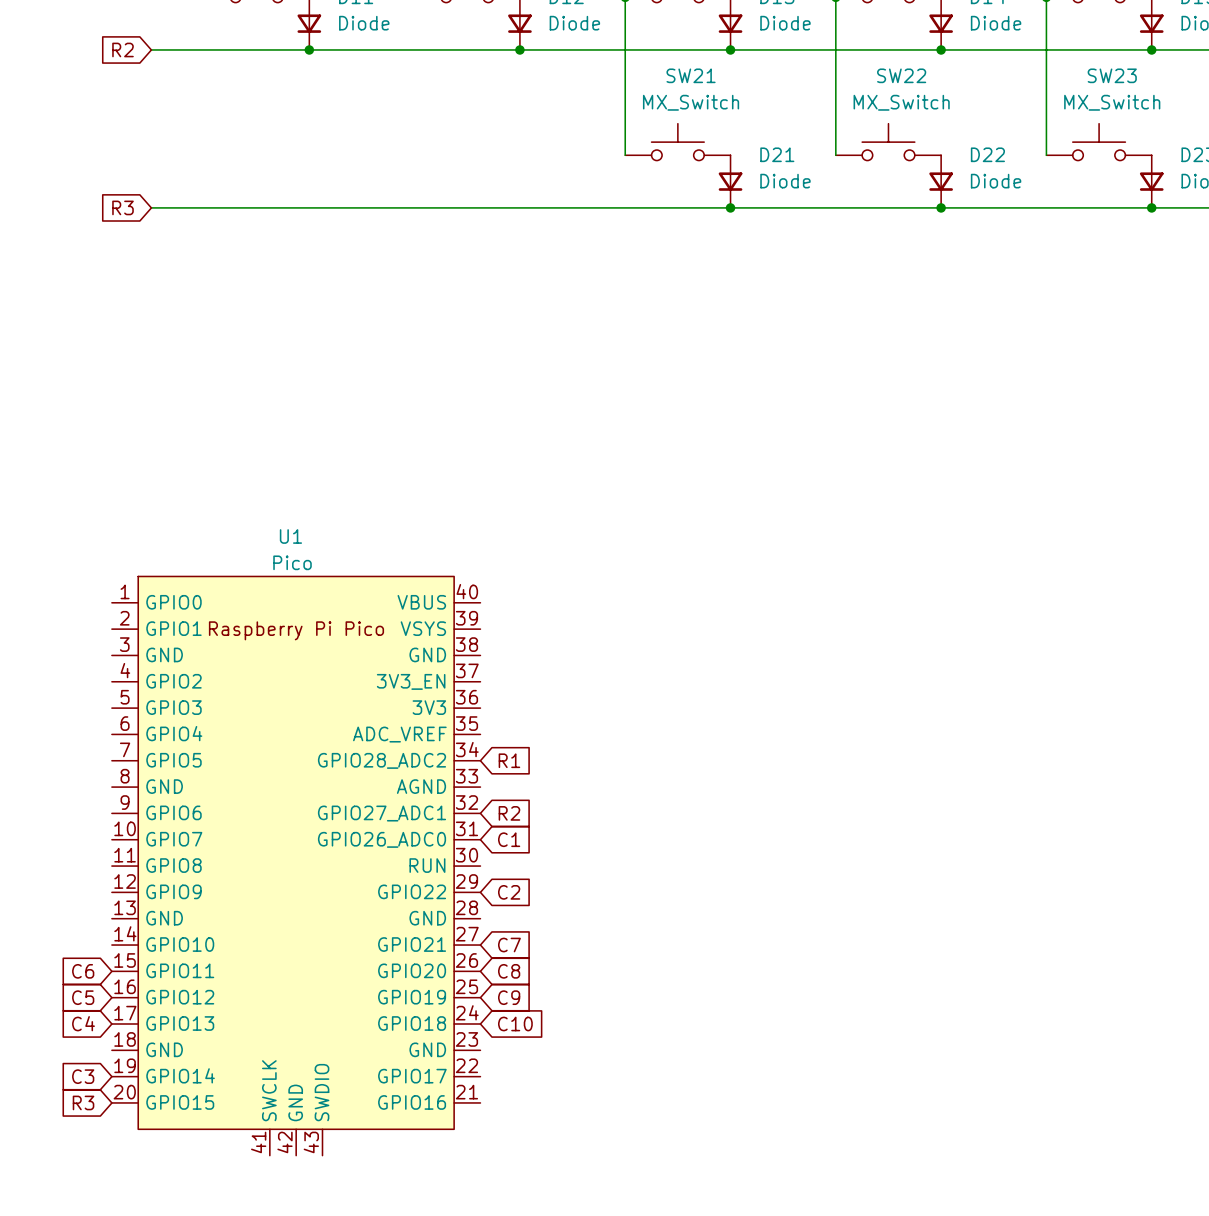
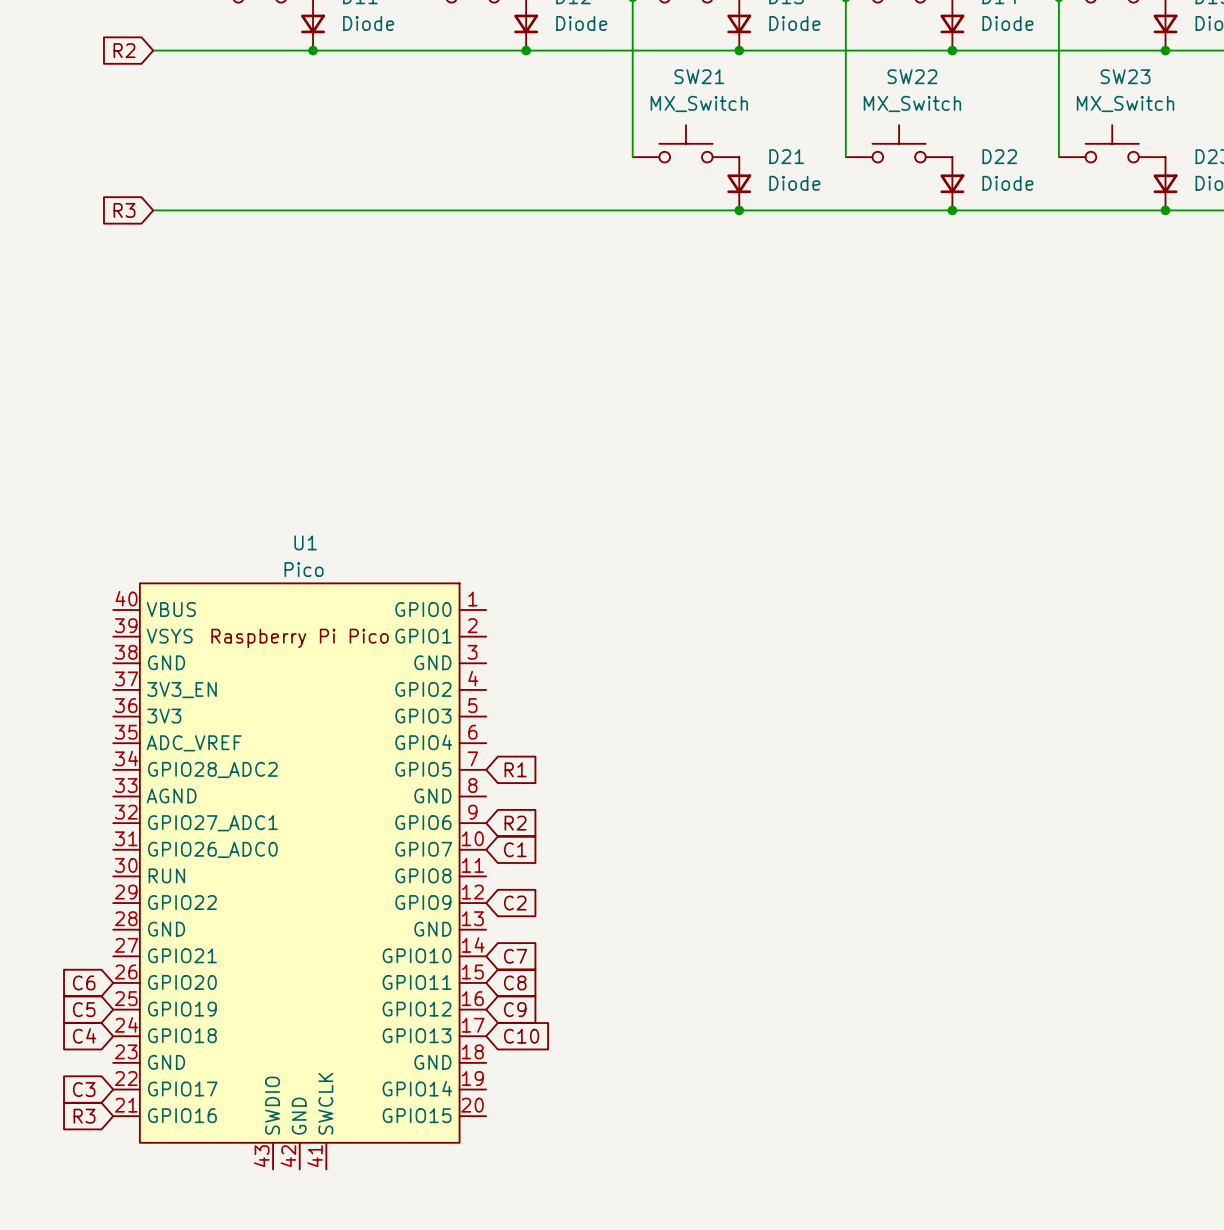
U1 flip: as is (296, 852) -> left-right (299, 863)

